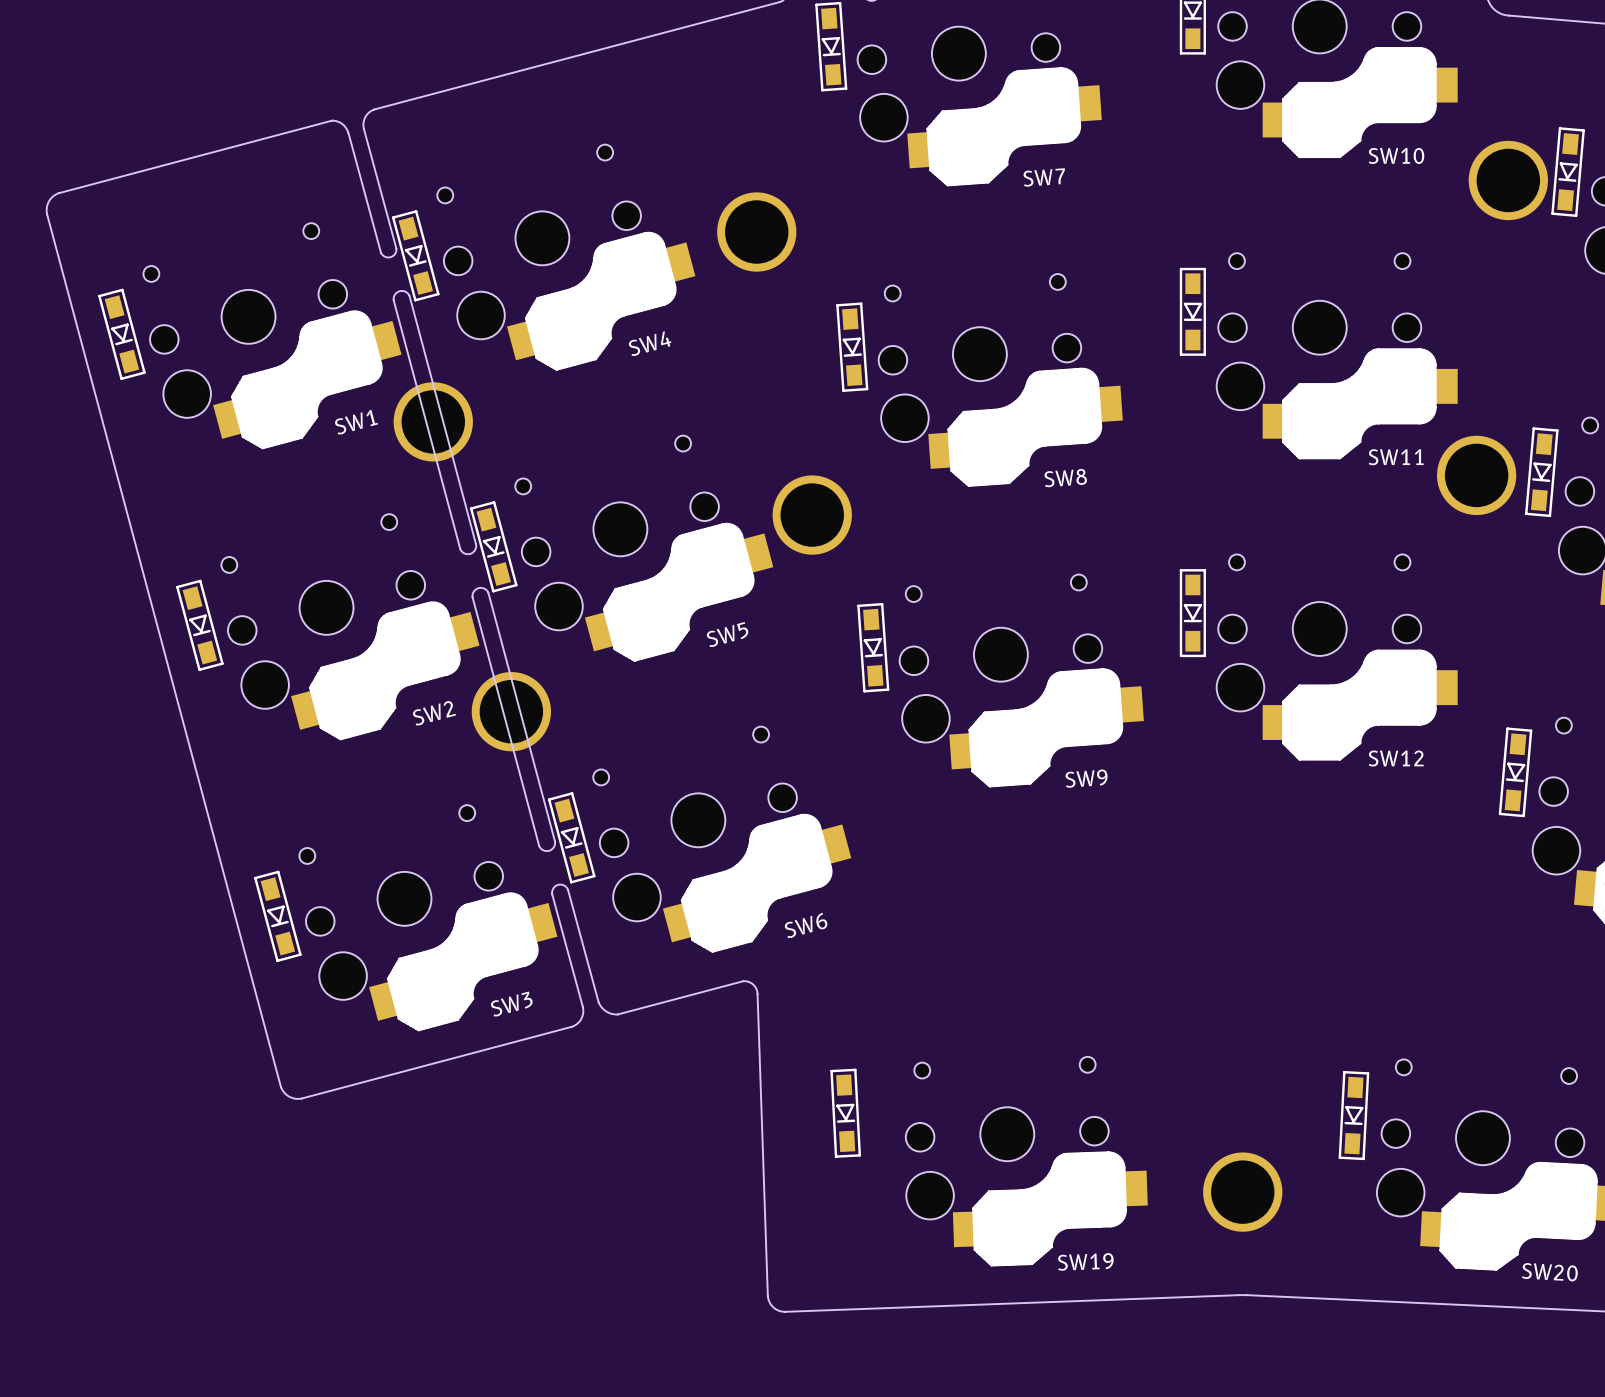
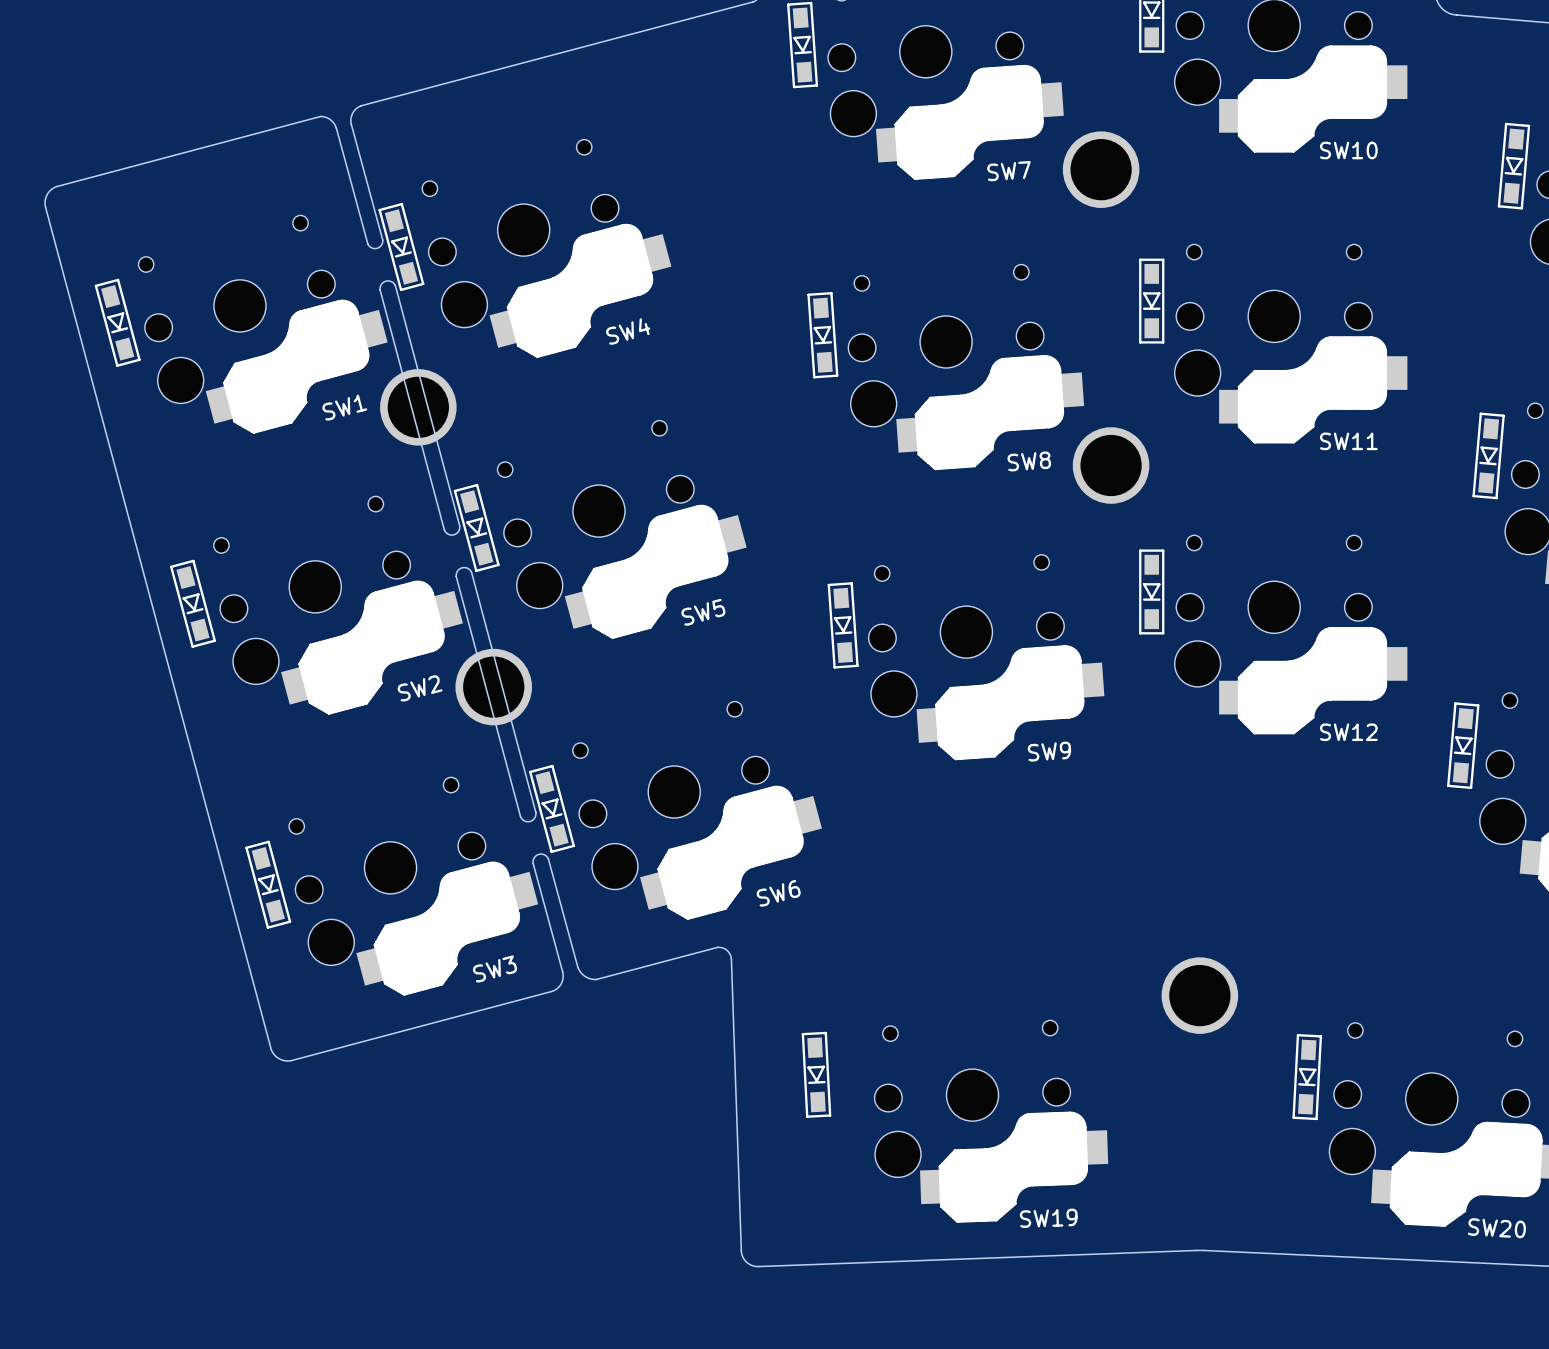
part: none -> (1101, 169)
part: (1508, 180) -> none
part: (756, 232) -> none
part: (1476, 475) -> none
part: none -> (1111, 465)
part: (812, 515) -> none
part position: (1242, 1192) -> (1199, 995)

